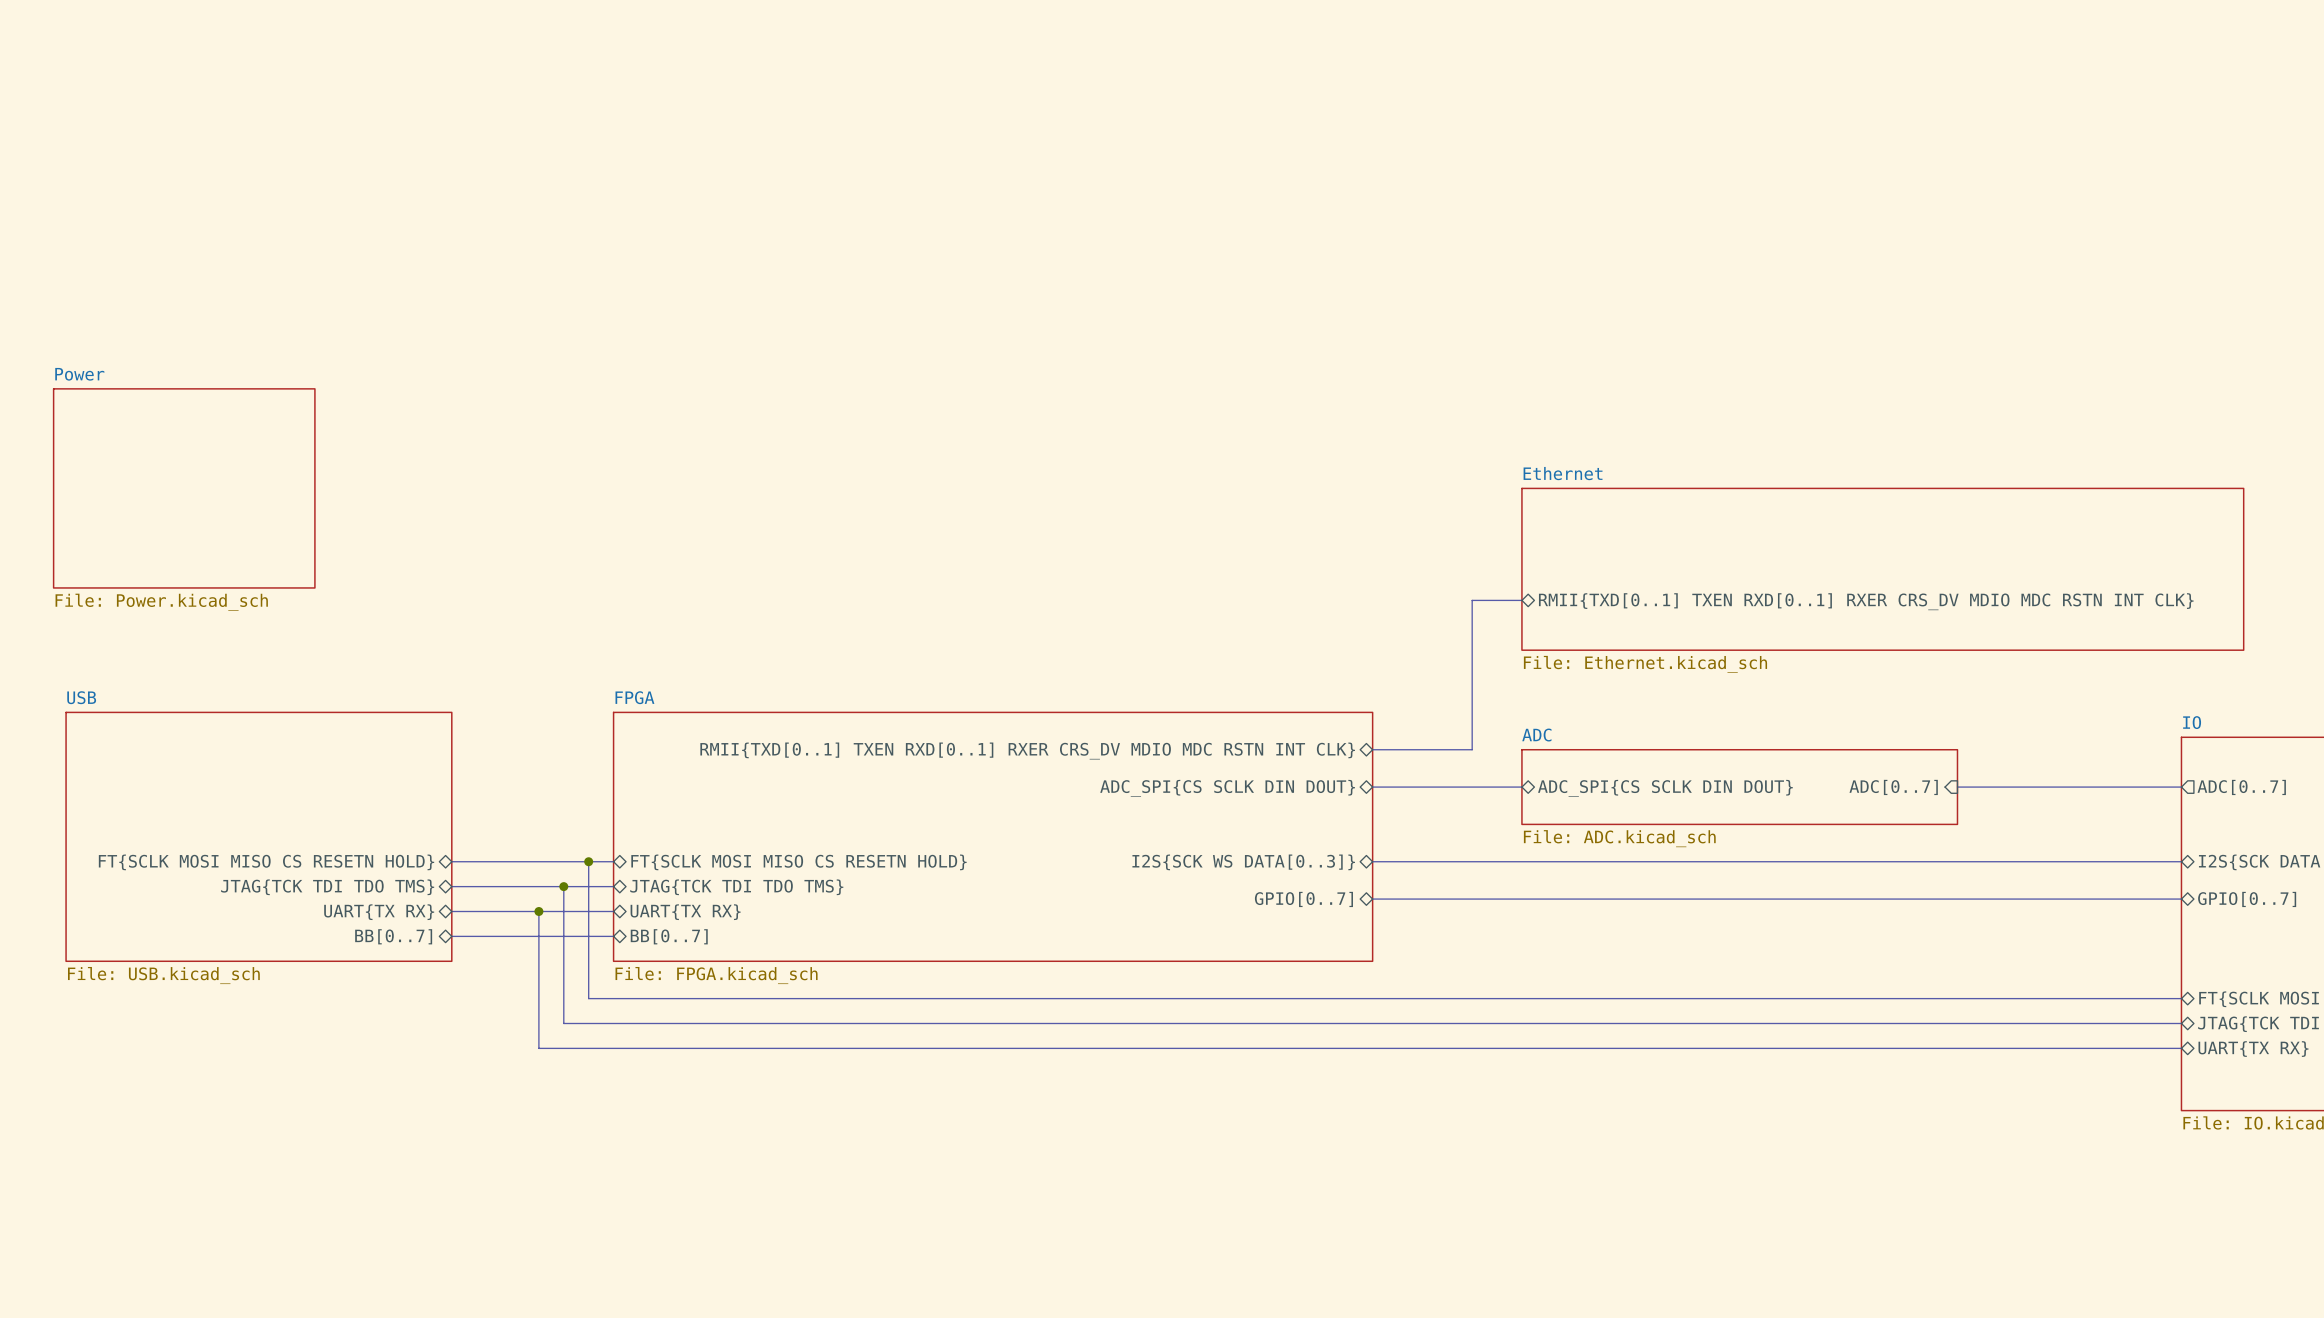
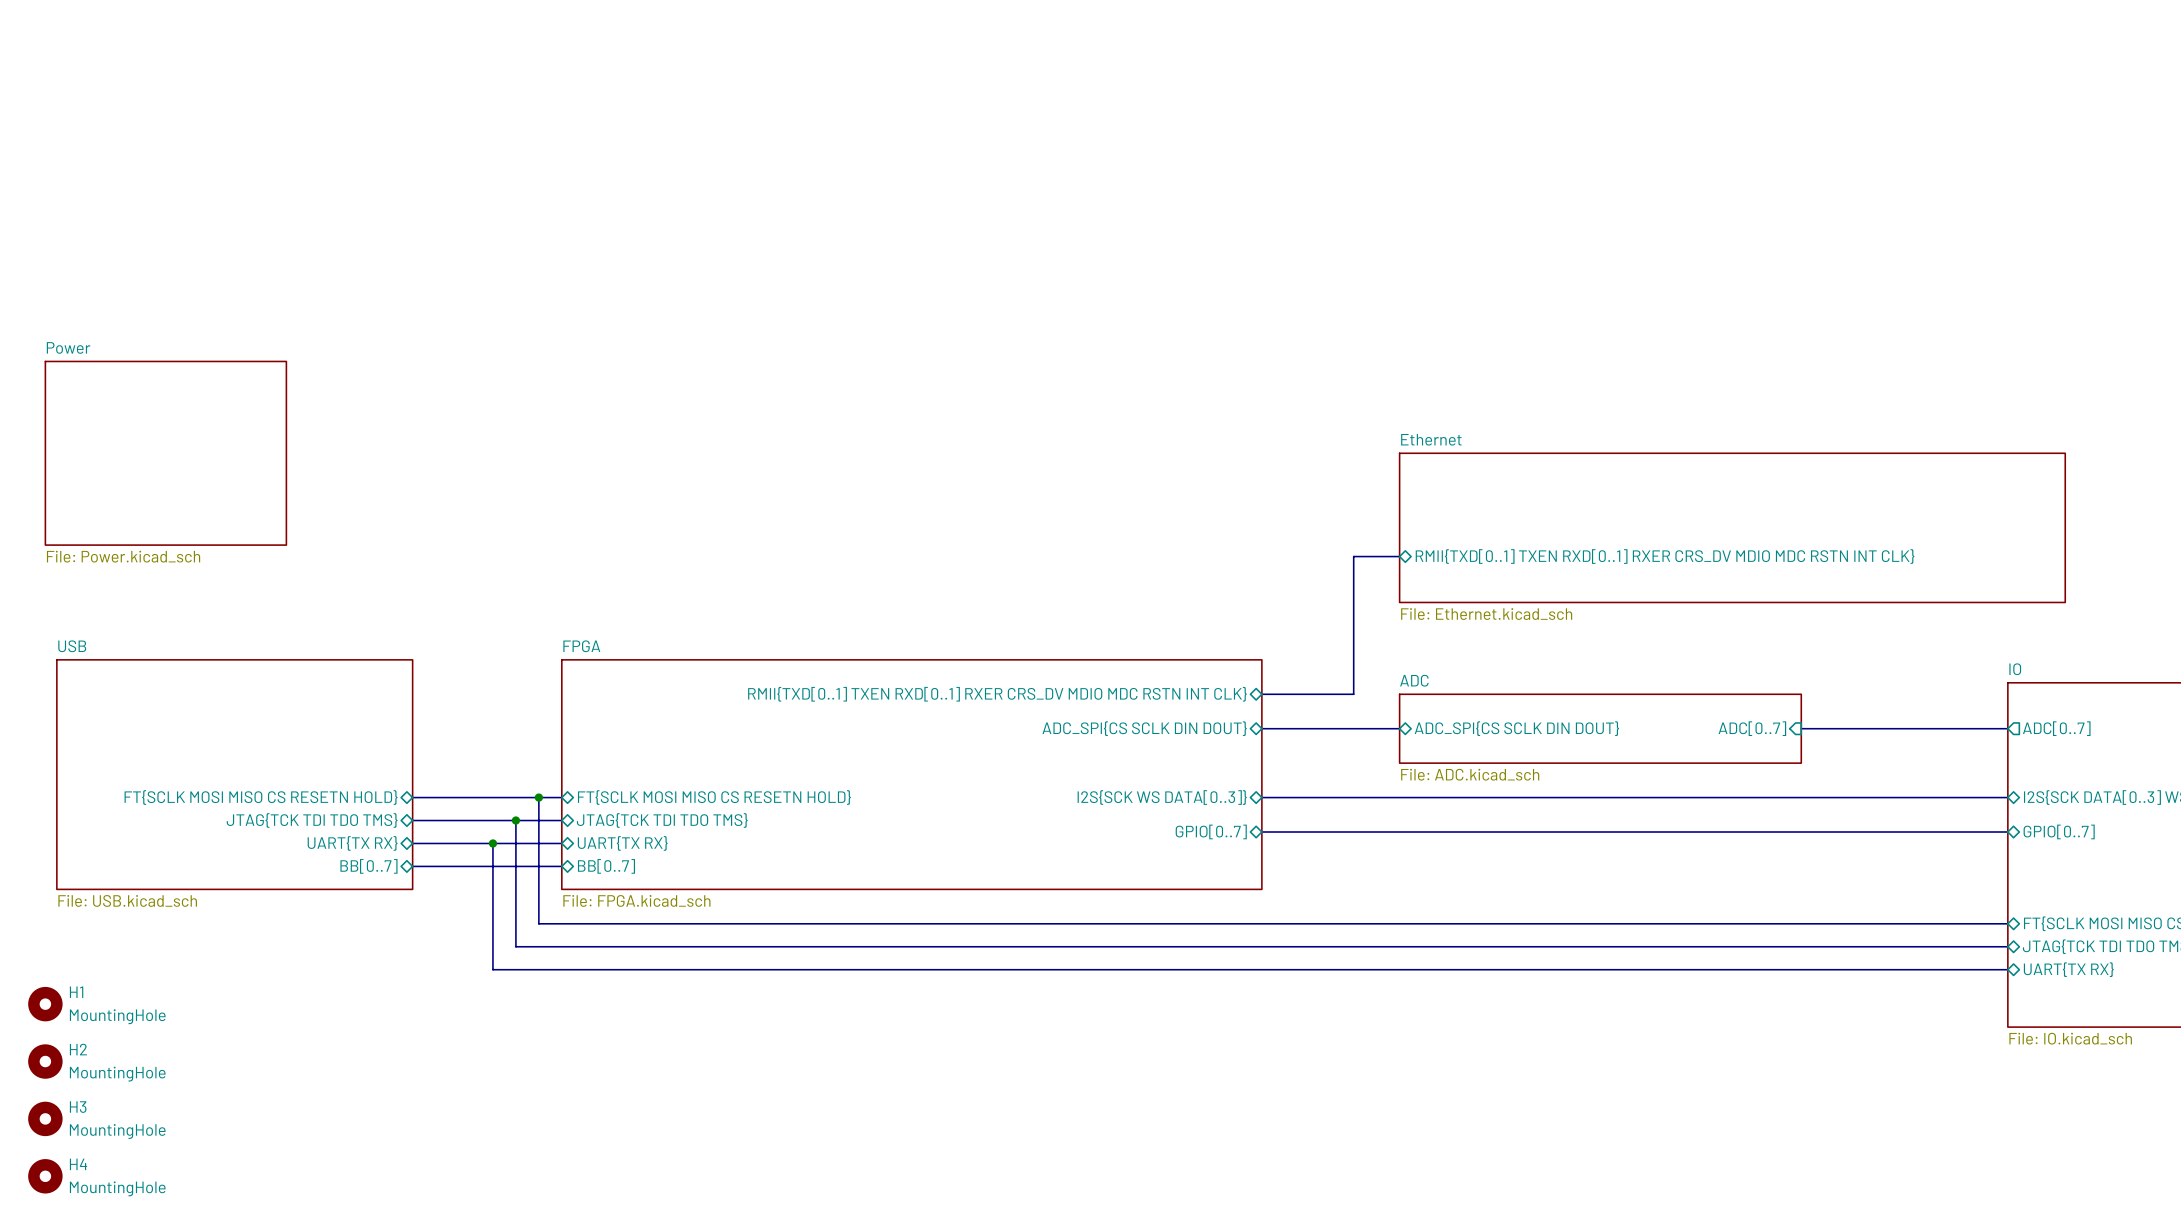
H1: none -> MountingHole (45, 1004)
H2: none -> MountingHole (45, 1061)
H3: none -> MountingHole (45, 1118)
H4: none -> MountingHole (45, 1176)

